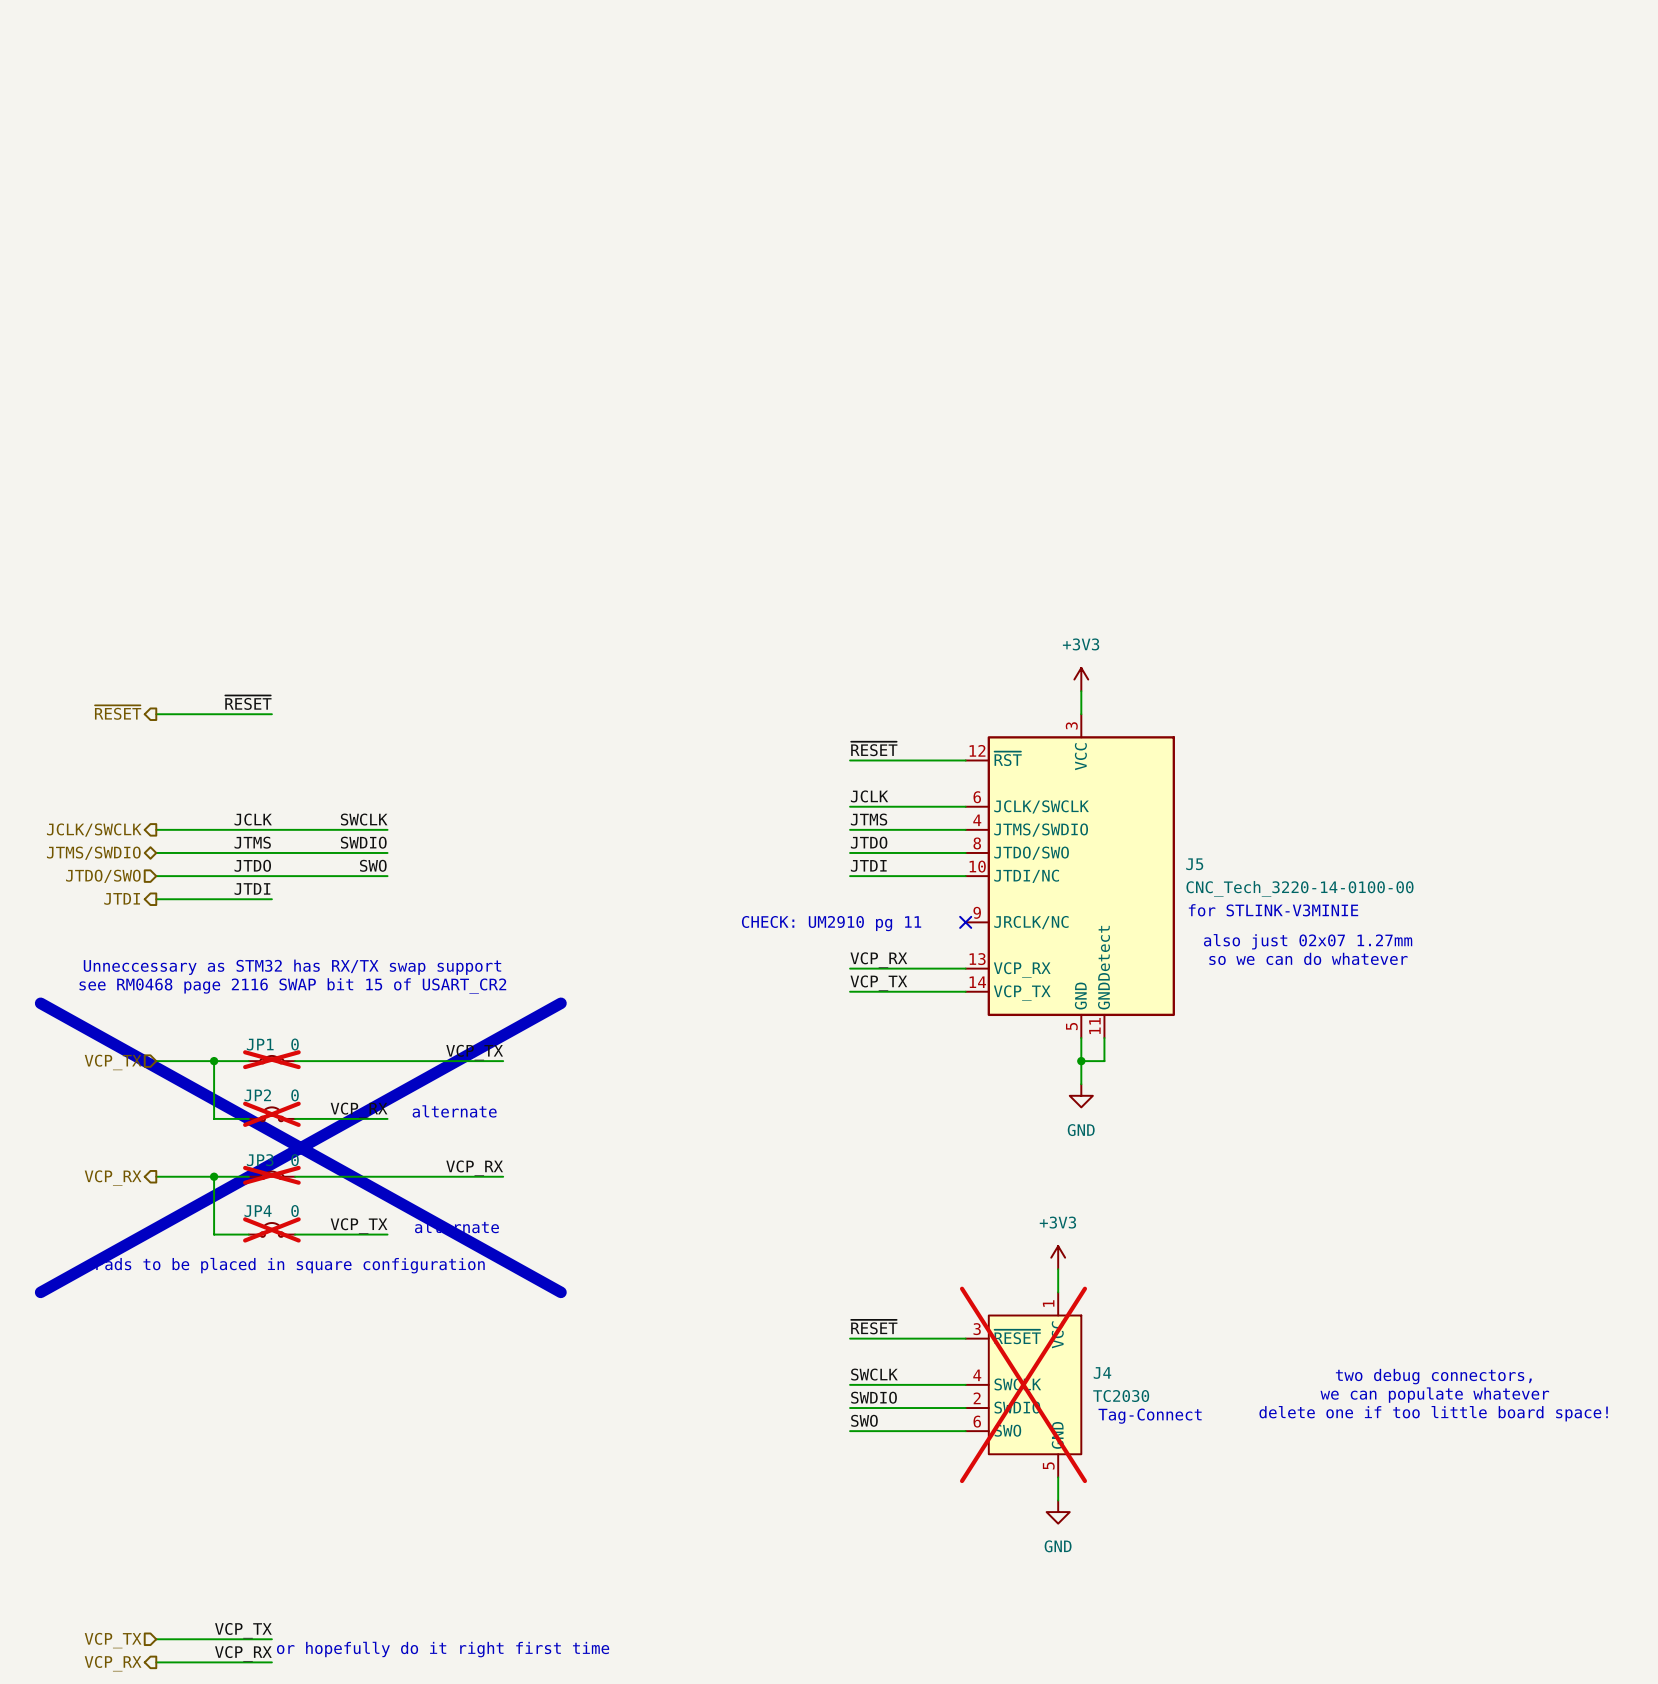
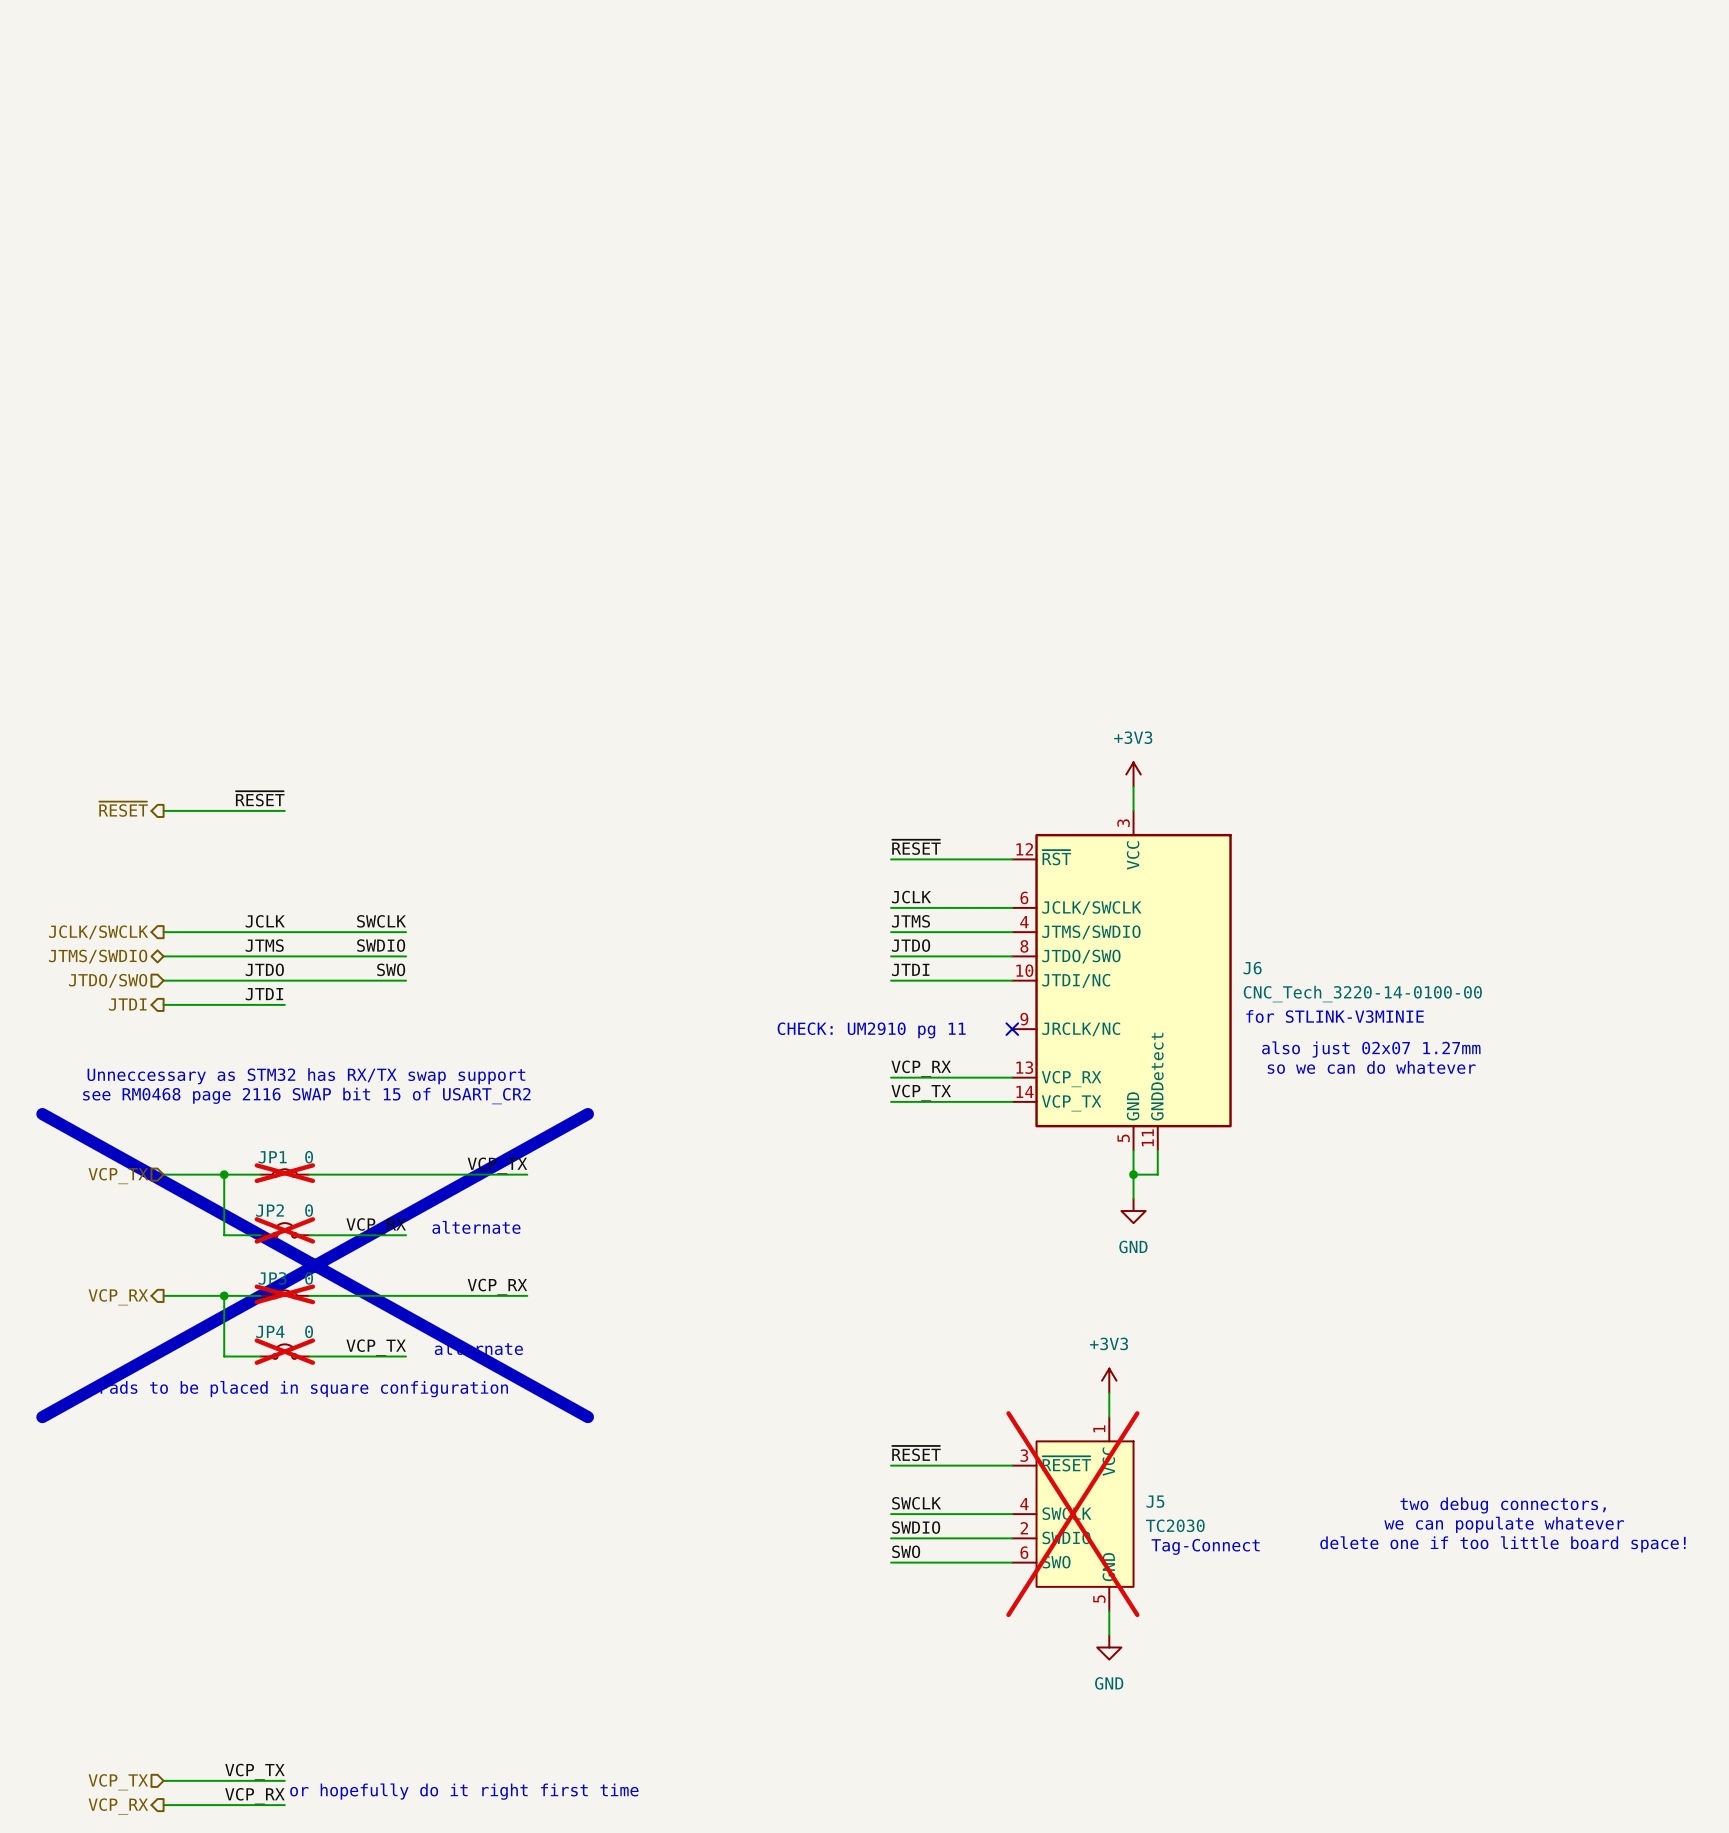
J5 name: J5 (1194, 864) -> J6 (1252, 968)
J4 name: J4 (1102, 1373) -> J5 (1155, 1501)

